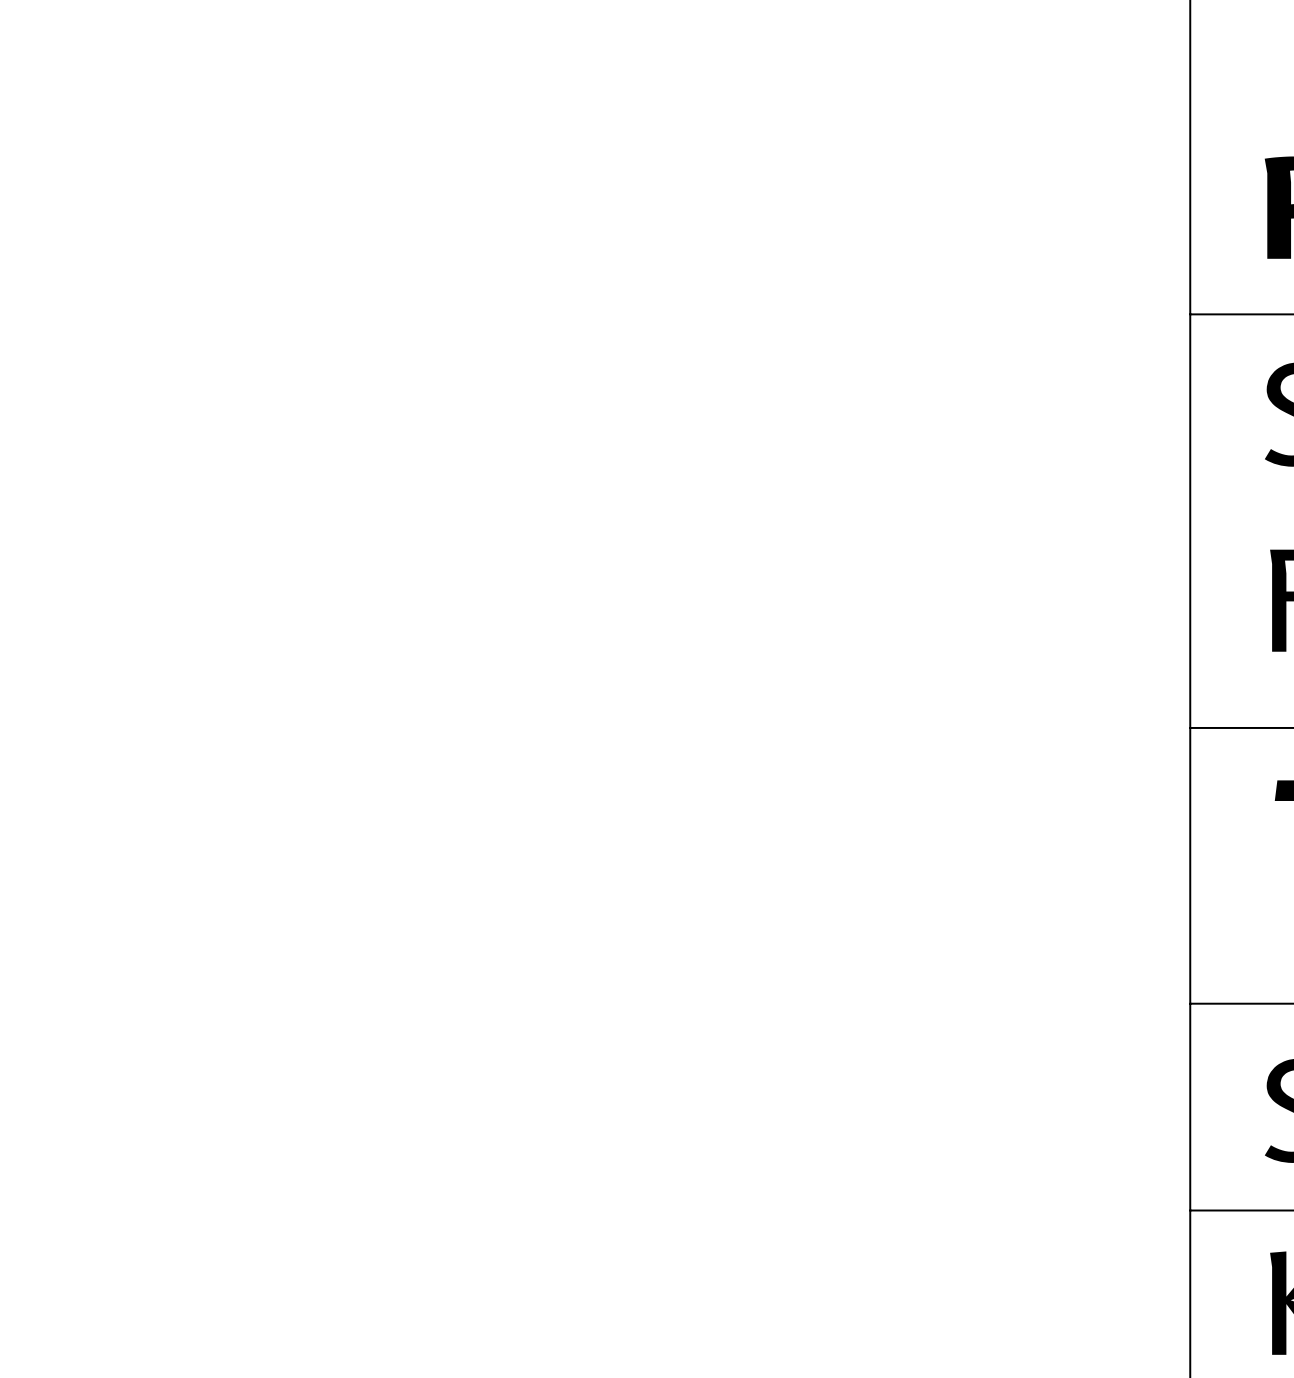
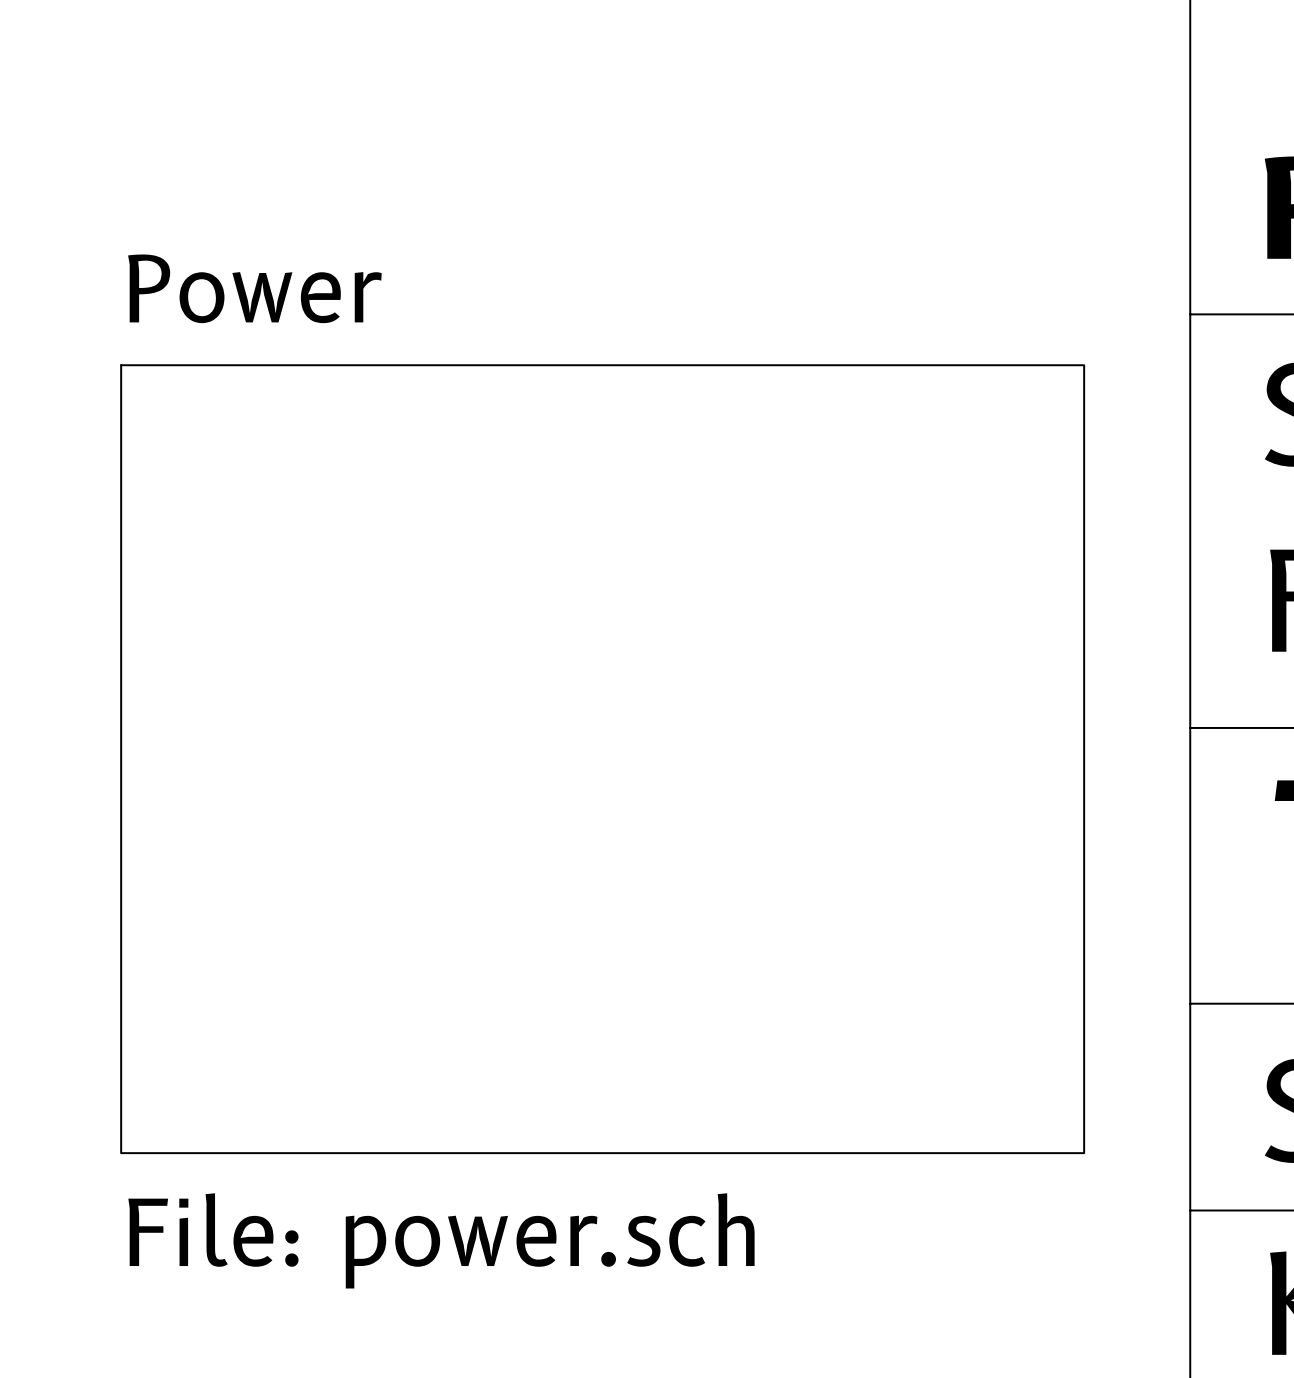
sheet Power: none -> File: power.sch (602, 759)

